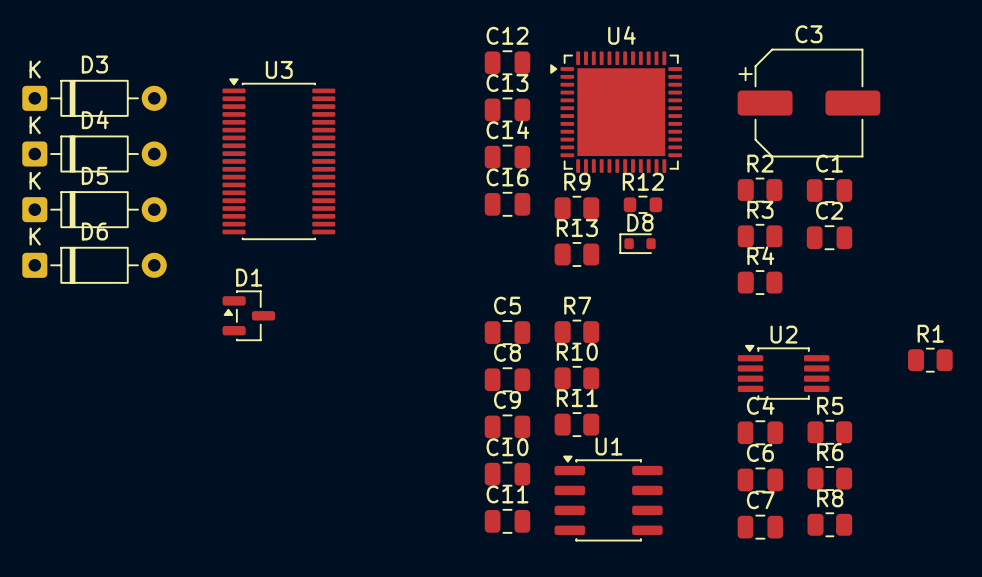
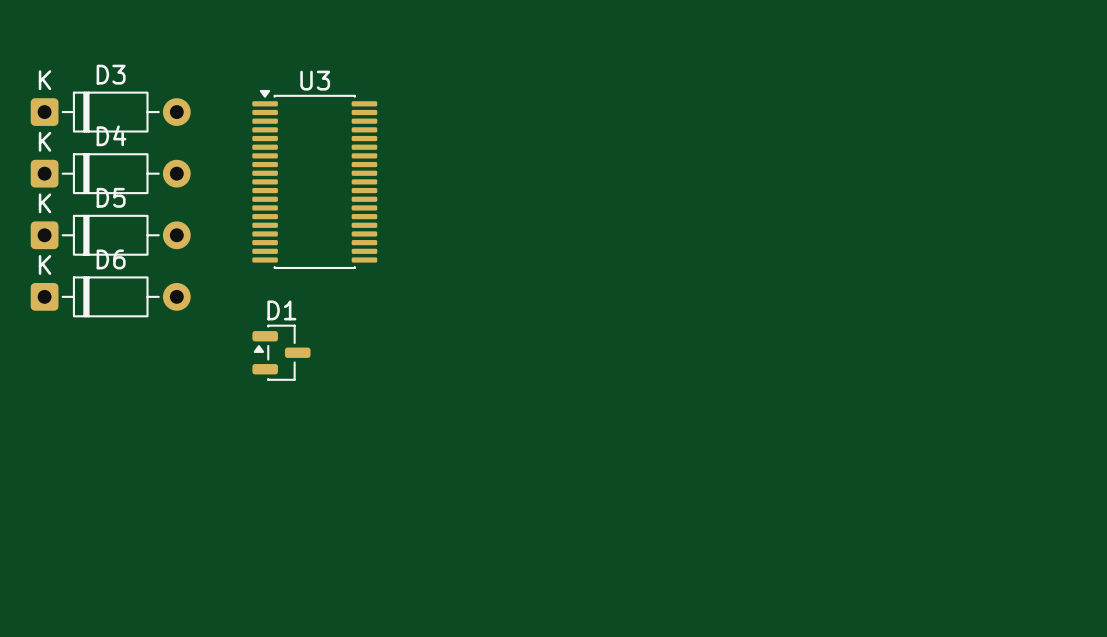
C12: (507, 62) -> none
C3: (808, 103) -> none
C13: (507, 109) -> none
U4: (616, 112) -> none
C14: (507, 157) -> none
R2: (760, 190) -> none
C1: (829, 190) -> none
C16: (507, 204) -> none
R12: (642, 204) -> none
R9: (576, 208) -> none
R3: (760, 236) -> none
C2: (829, 237) -> none
D8: (637, 243) -> none
R13: (576, 254) -> none
R4: (760, 282) -> none
C5: (507, 332) -> none
R7: (576, 332) -> none
R1: (930, 360) -> none
U2: (783, 372) -> none
R10: (576, 378) -> none
C8: (507, 379) -> none
R11: (576, 424) -> none
C9: (507, 426) -> none
C4: (760, 432) -> none
R5: (829, 432) -> none
C10: (507, 474) -> none
R6: (829, 478) -> none
C6: (760, 479) -> none
U1: (608, 498) -> none
C11: (507, 521) -> none
R8: (829, 524) -> none
C7: (760, 527) -> none

